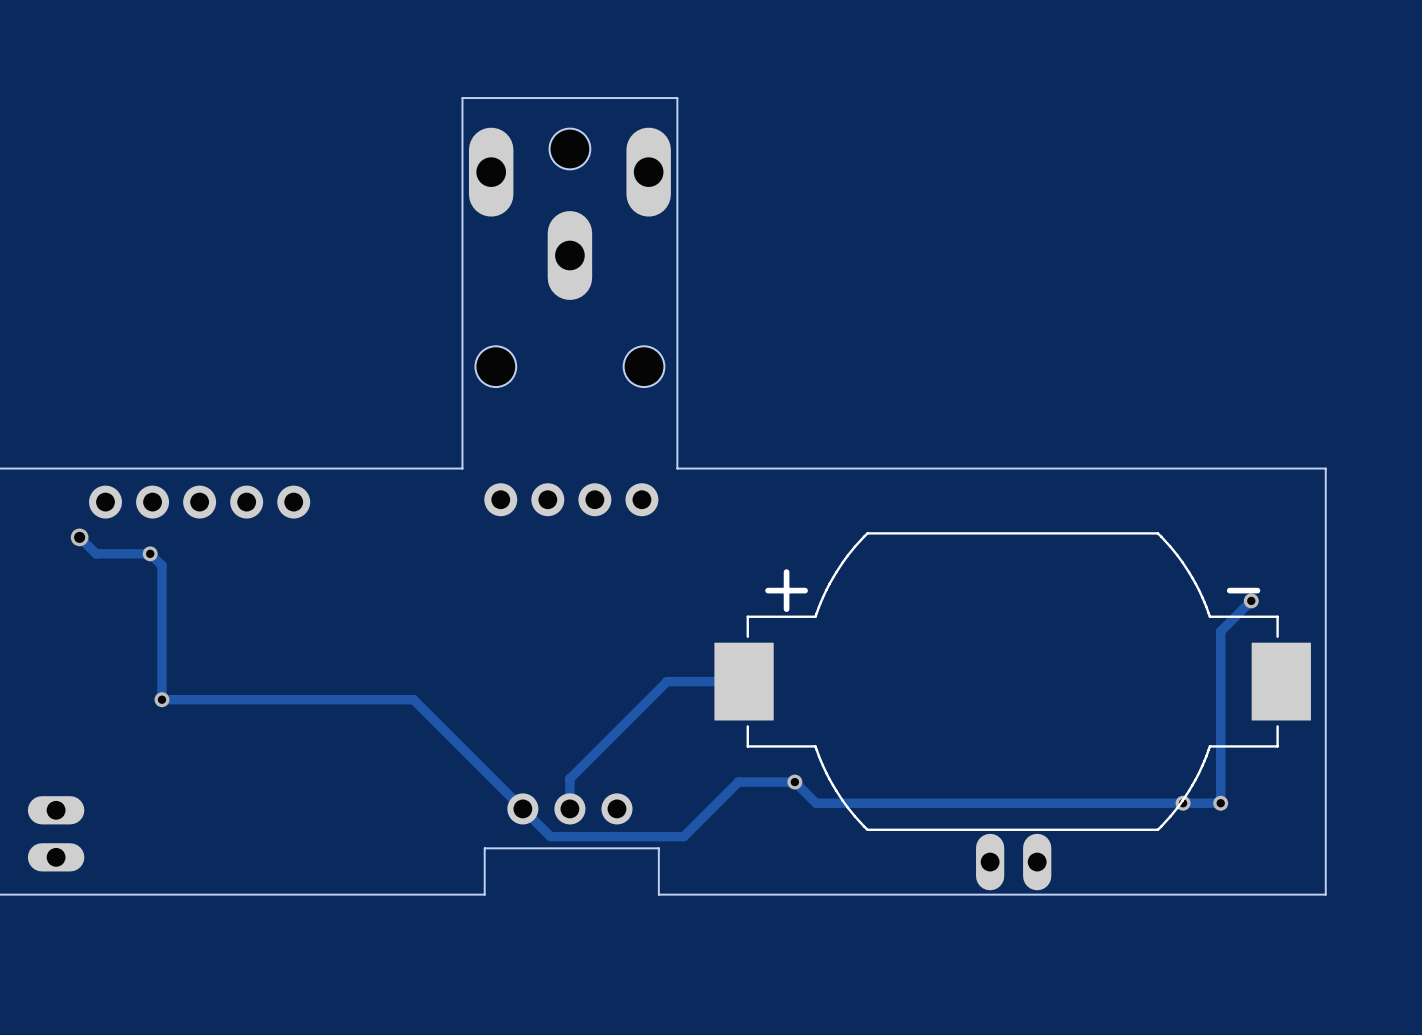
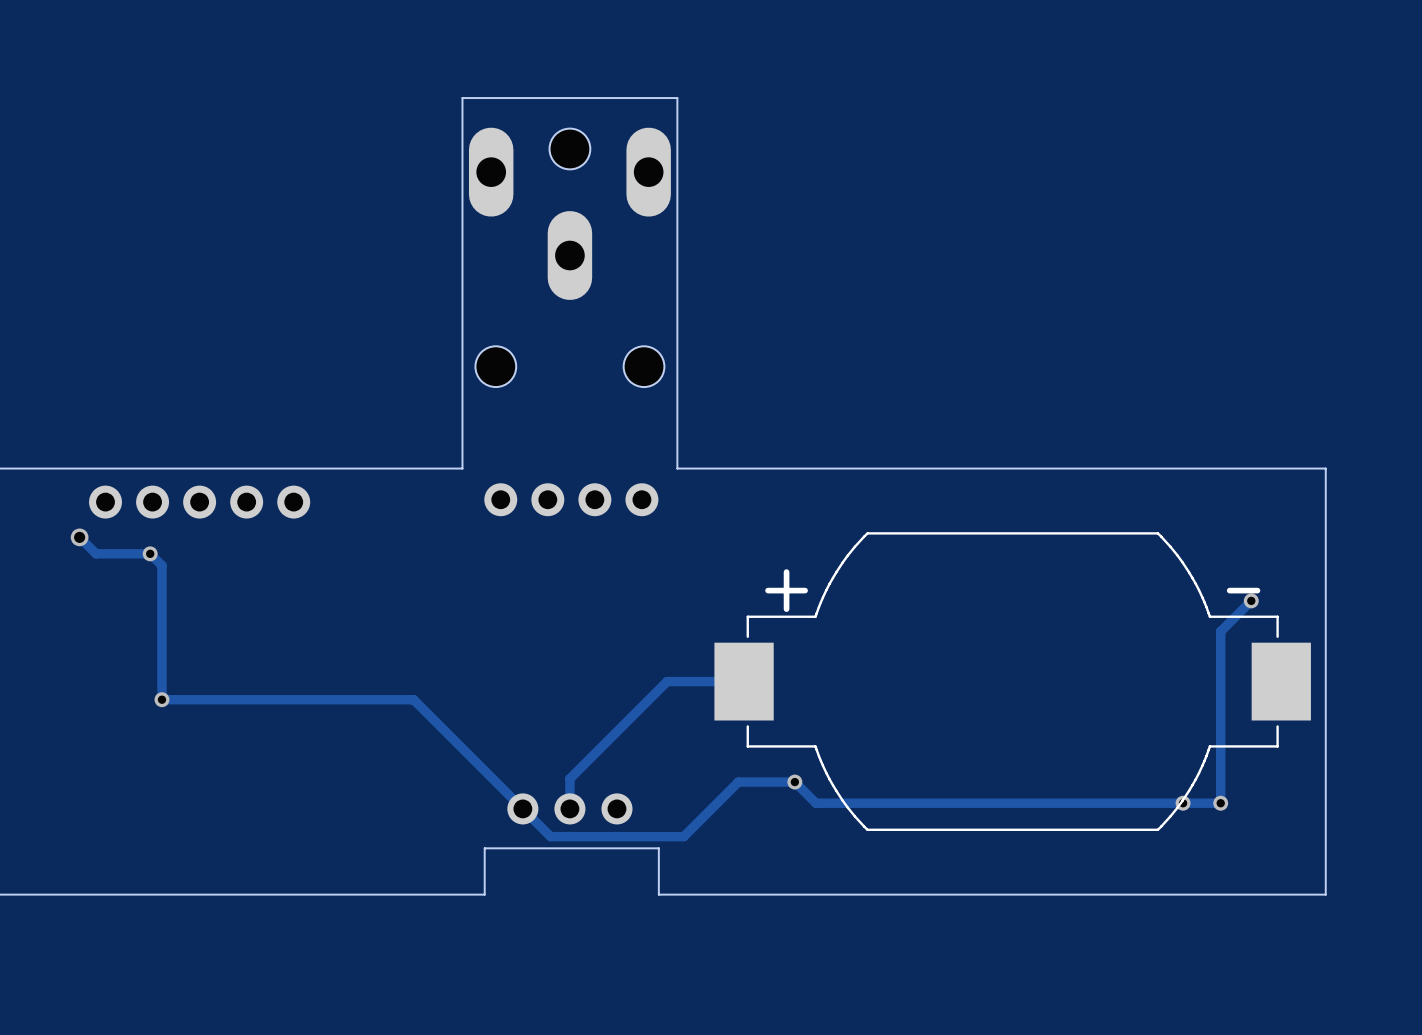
part: (56, 833) -> none
part: (1013, 862) -> none

